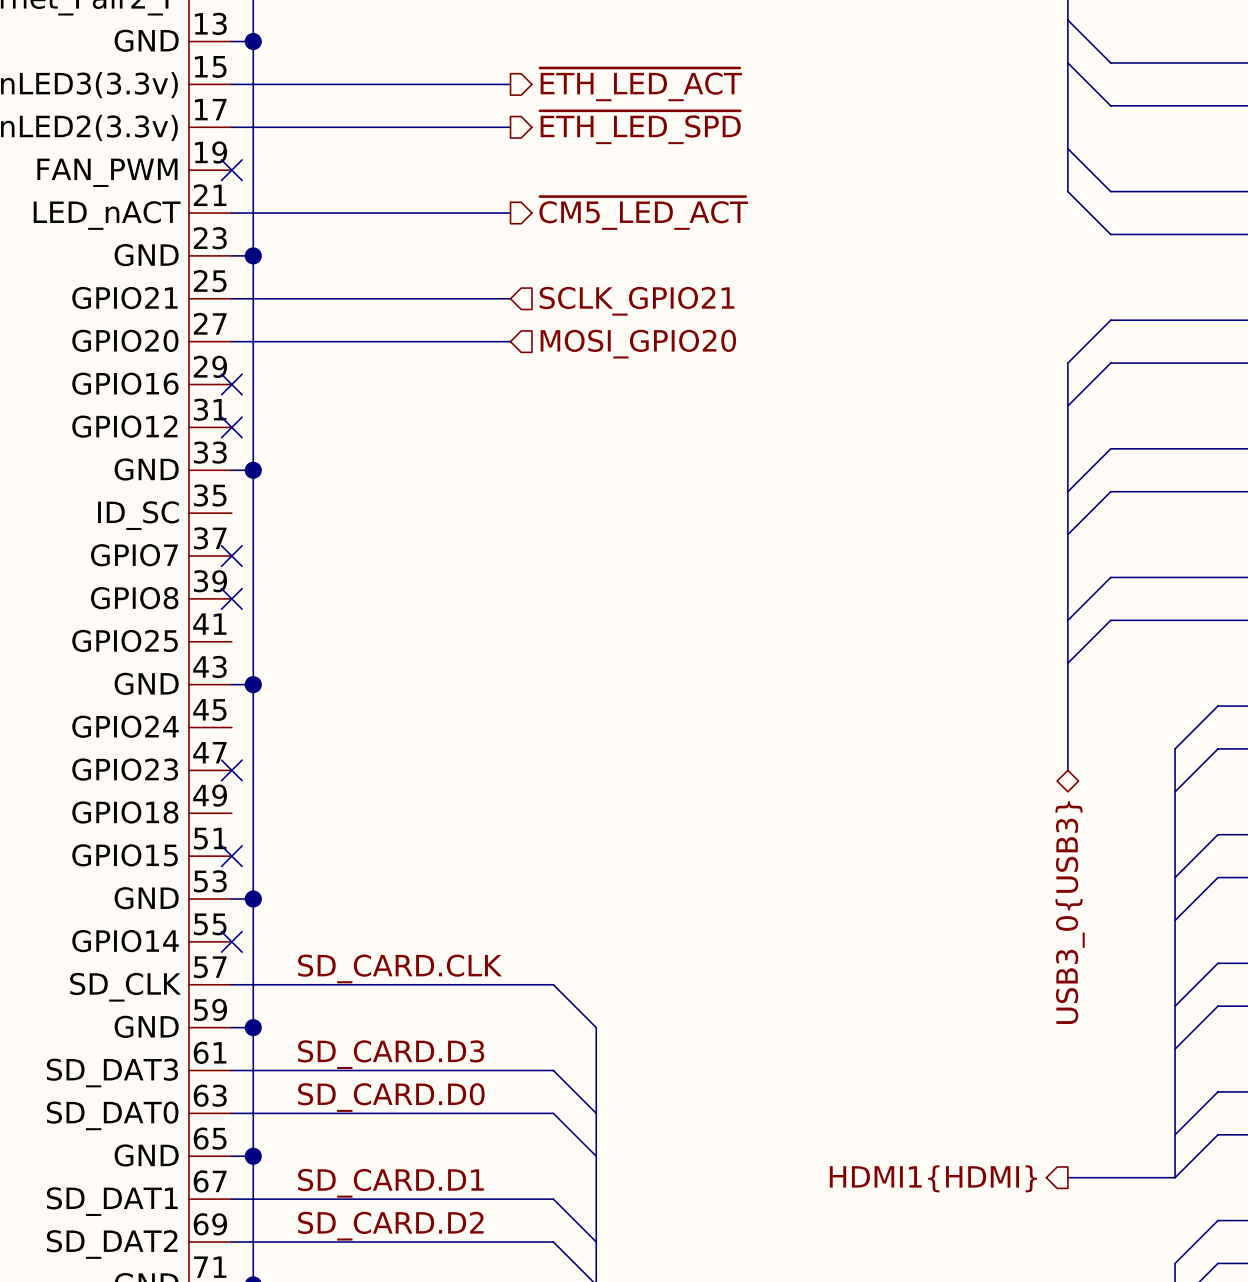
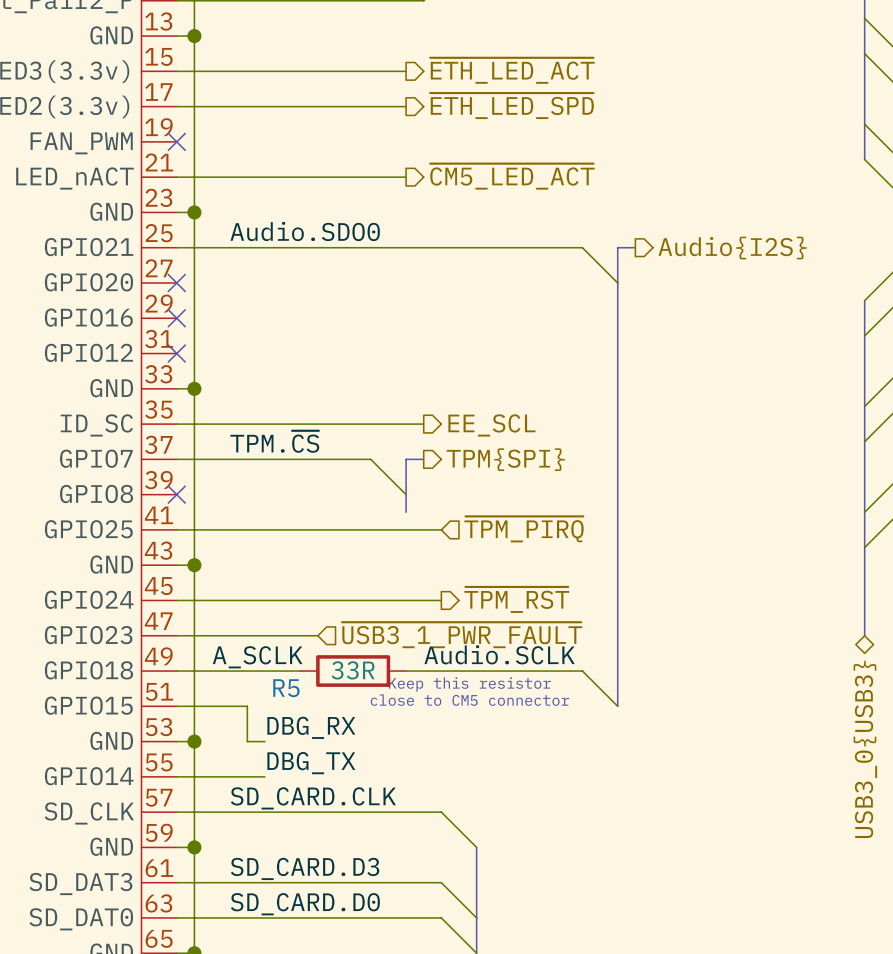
label: none -> Audio.SDO0 (305, 231)
wire: none -> (406, 247) (582, 247) (617, 282)
bus: none -> (635, 247) (617, 247) (617, 706)
hierarchical label: none -> Audio{I2S} (732, 248)
hierarchical label: SCLK_GPIO21 (637, 301) -> none
wire: (231, 341) (510, 341) -> none
no-connect mark: none -> (176, 282)
hierarchical label: MOSI_GPIO20 (638, 344) -> none
wire: none -> (176, 424) (423, 424)
hierarchical label: none -> EE_SCL (491, 425)
label: none -> TPM.~{CS} (274, 441)
wire: none -> (176, 459) (370, 459) (406, 494)
no-connect mark: (231, 556) -> none
bus: none -> (423, 459) (406, 459) (406, 512)
hierarchical label: none -> TPM{SPI} (505, 459)
wire: none -> (176, 529) (441, 529)
hierarchical label: none -> ~{TPM_PIRQ} (524, 529)
wire: none -> (176, 600) (441, 600)
hierarchical label: none -> ~{TPM_RST} (516, 599)
wire: none -> (176, 635) (317, 635)
no-connect mark: (231, 770) -> none
hierarchical label: none -> ~{USB3_1_PWR_FAULT} (462, 635)
label: none -> Audio.SCLK (499, 654)
label: none -> A_SCLK (257, 657)
wire: none -> (176, 671) (300, 671)
R5: none -> 33R (353, 671)
wire: none -> (406, 671) (582, 671) (617, 706)
text: none -> Keep this resistor (469, 684)
text: none -> close to CM5 connector (469, 700)
wire: none -> (176, 706) (247, 706) (247, 741) (264, 741)
no-connect mark: (231, 856) -> none
label: none -> DBG_RX (311, 727)
label: none -> DBG_TX (311, 763)
wire: none -> (176, 776) (264, 776)
no-connect mark: (231, 941) -> none

